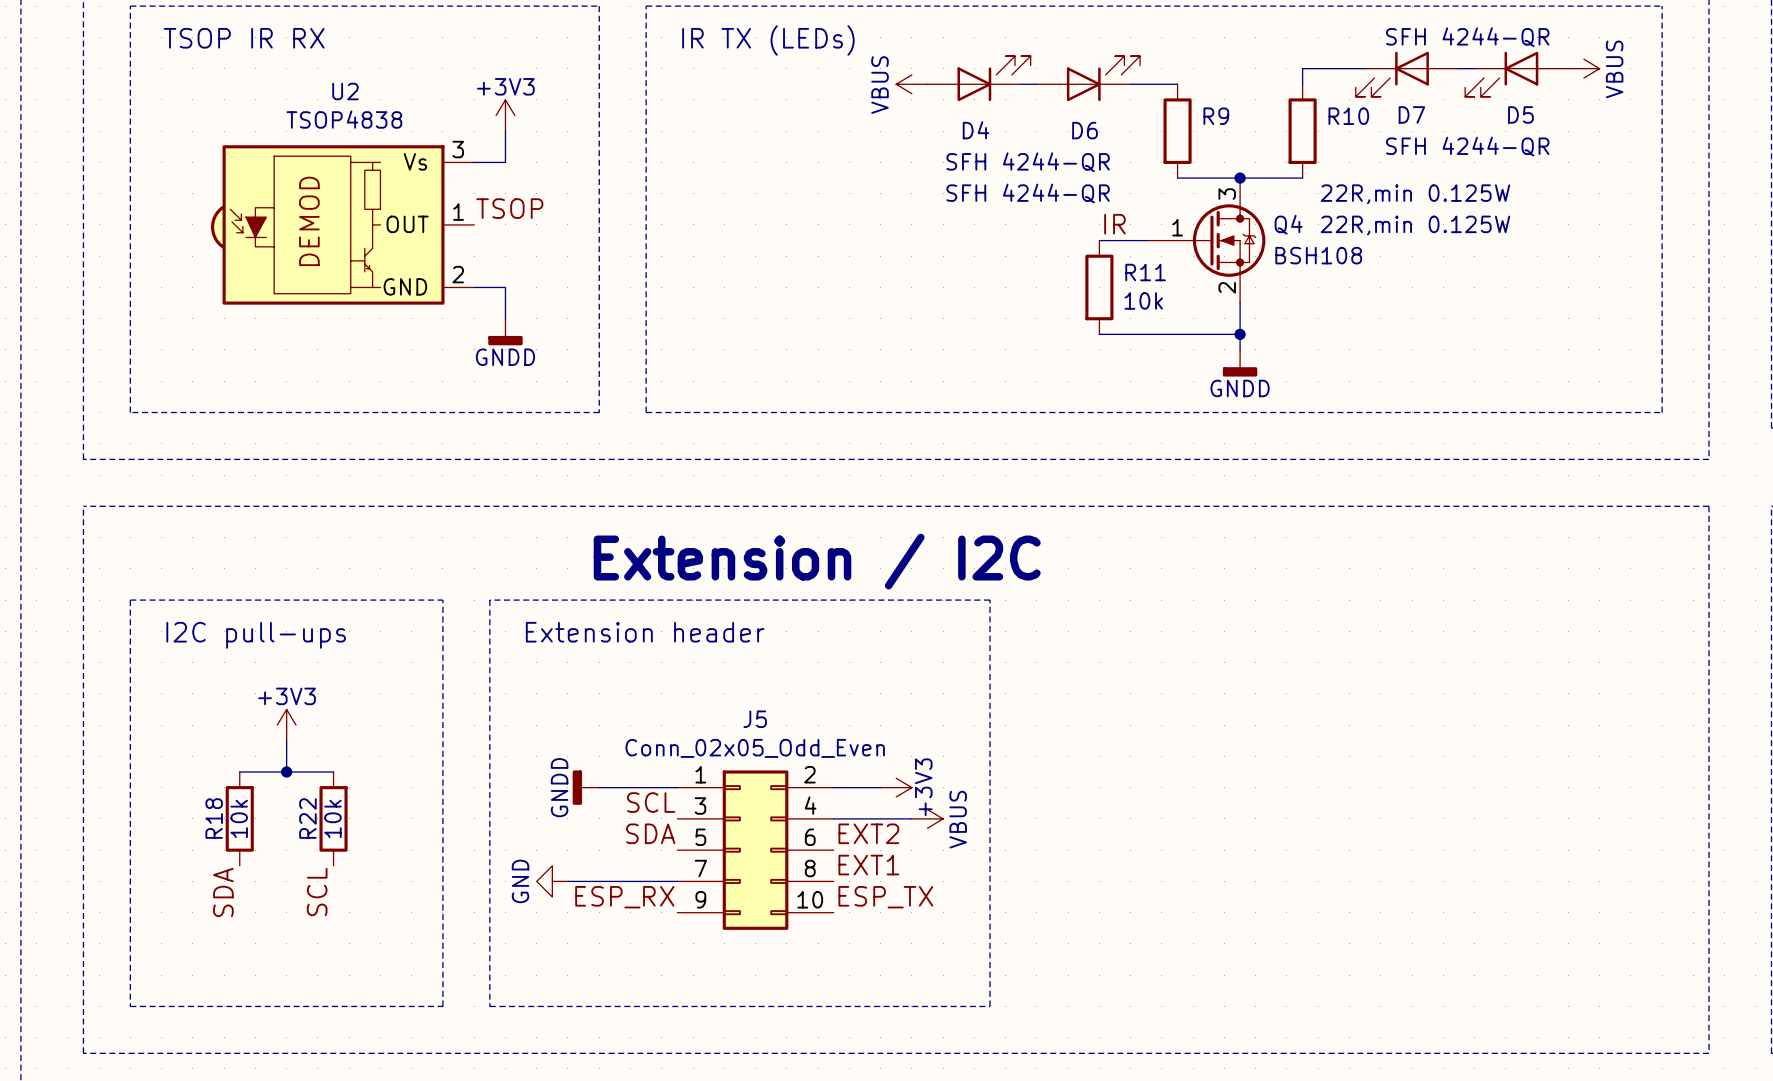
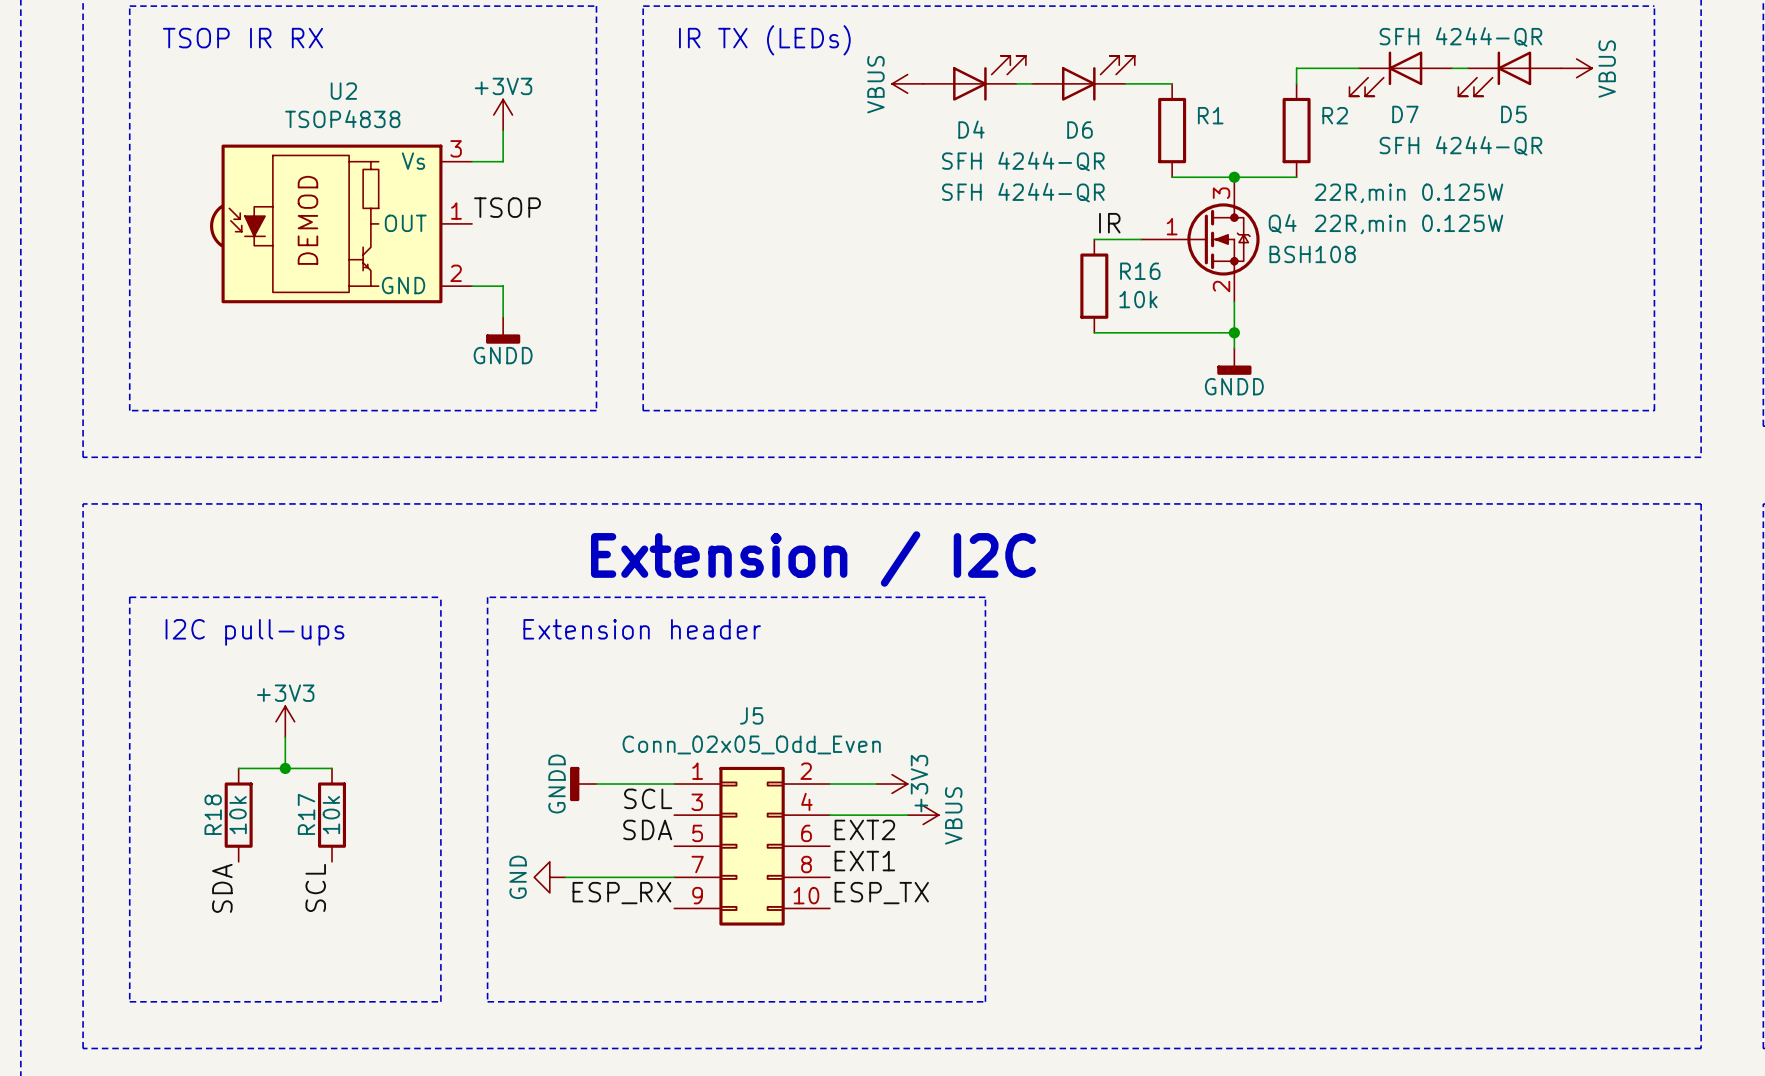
R9 name: R9 (1216, 116) -> R1 (1210, 115)
R10 name: R10 (1348, 116) -> R2 (1335, 115)
R11 name: R11 (1145, 272) -> R16 (1140, 271)
R22 name: R22 (307, 818) -> R17 (306, 814)

